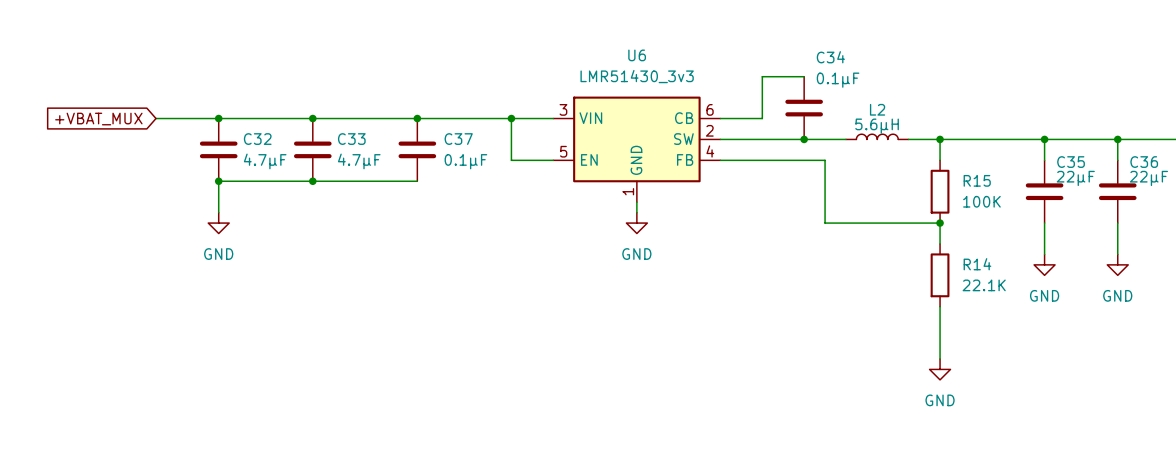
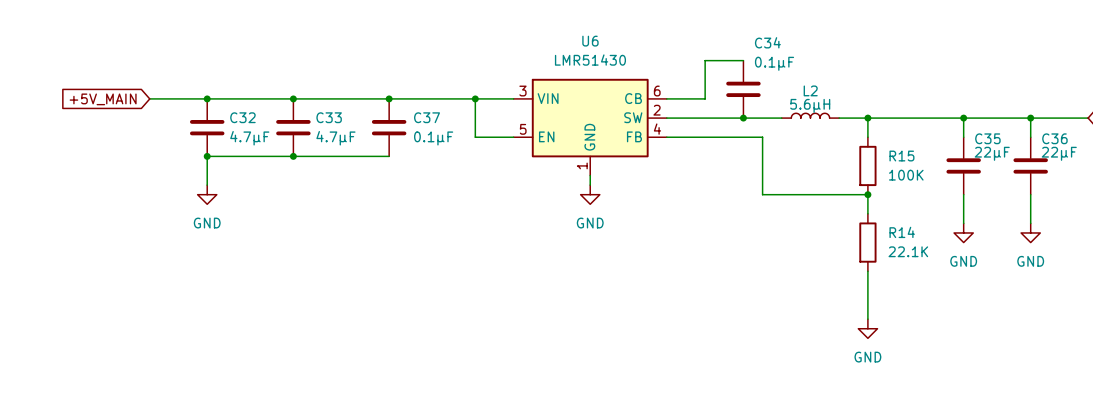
U6 value: LMR51430_3v3 (637, 76) -> LMR51430 (590, 60)
global label: +VBAT_MUX (98, 119) -> +5V_MAIN (103, 99)

